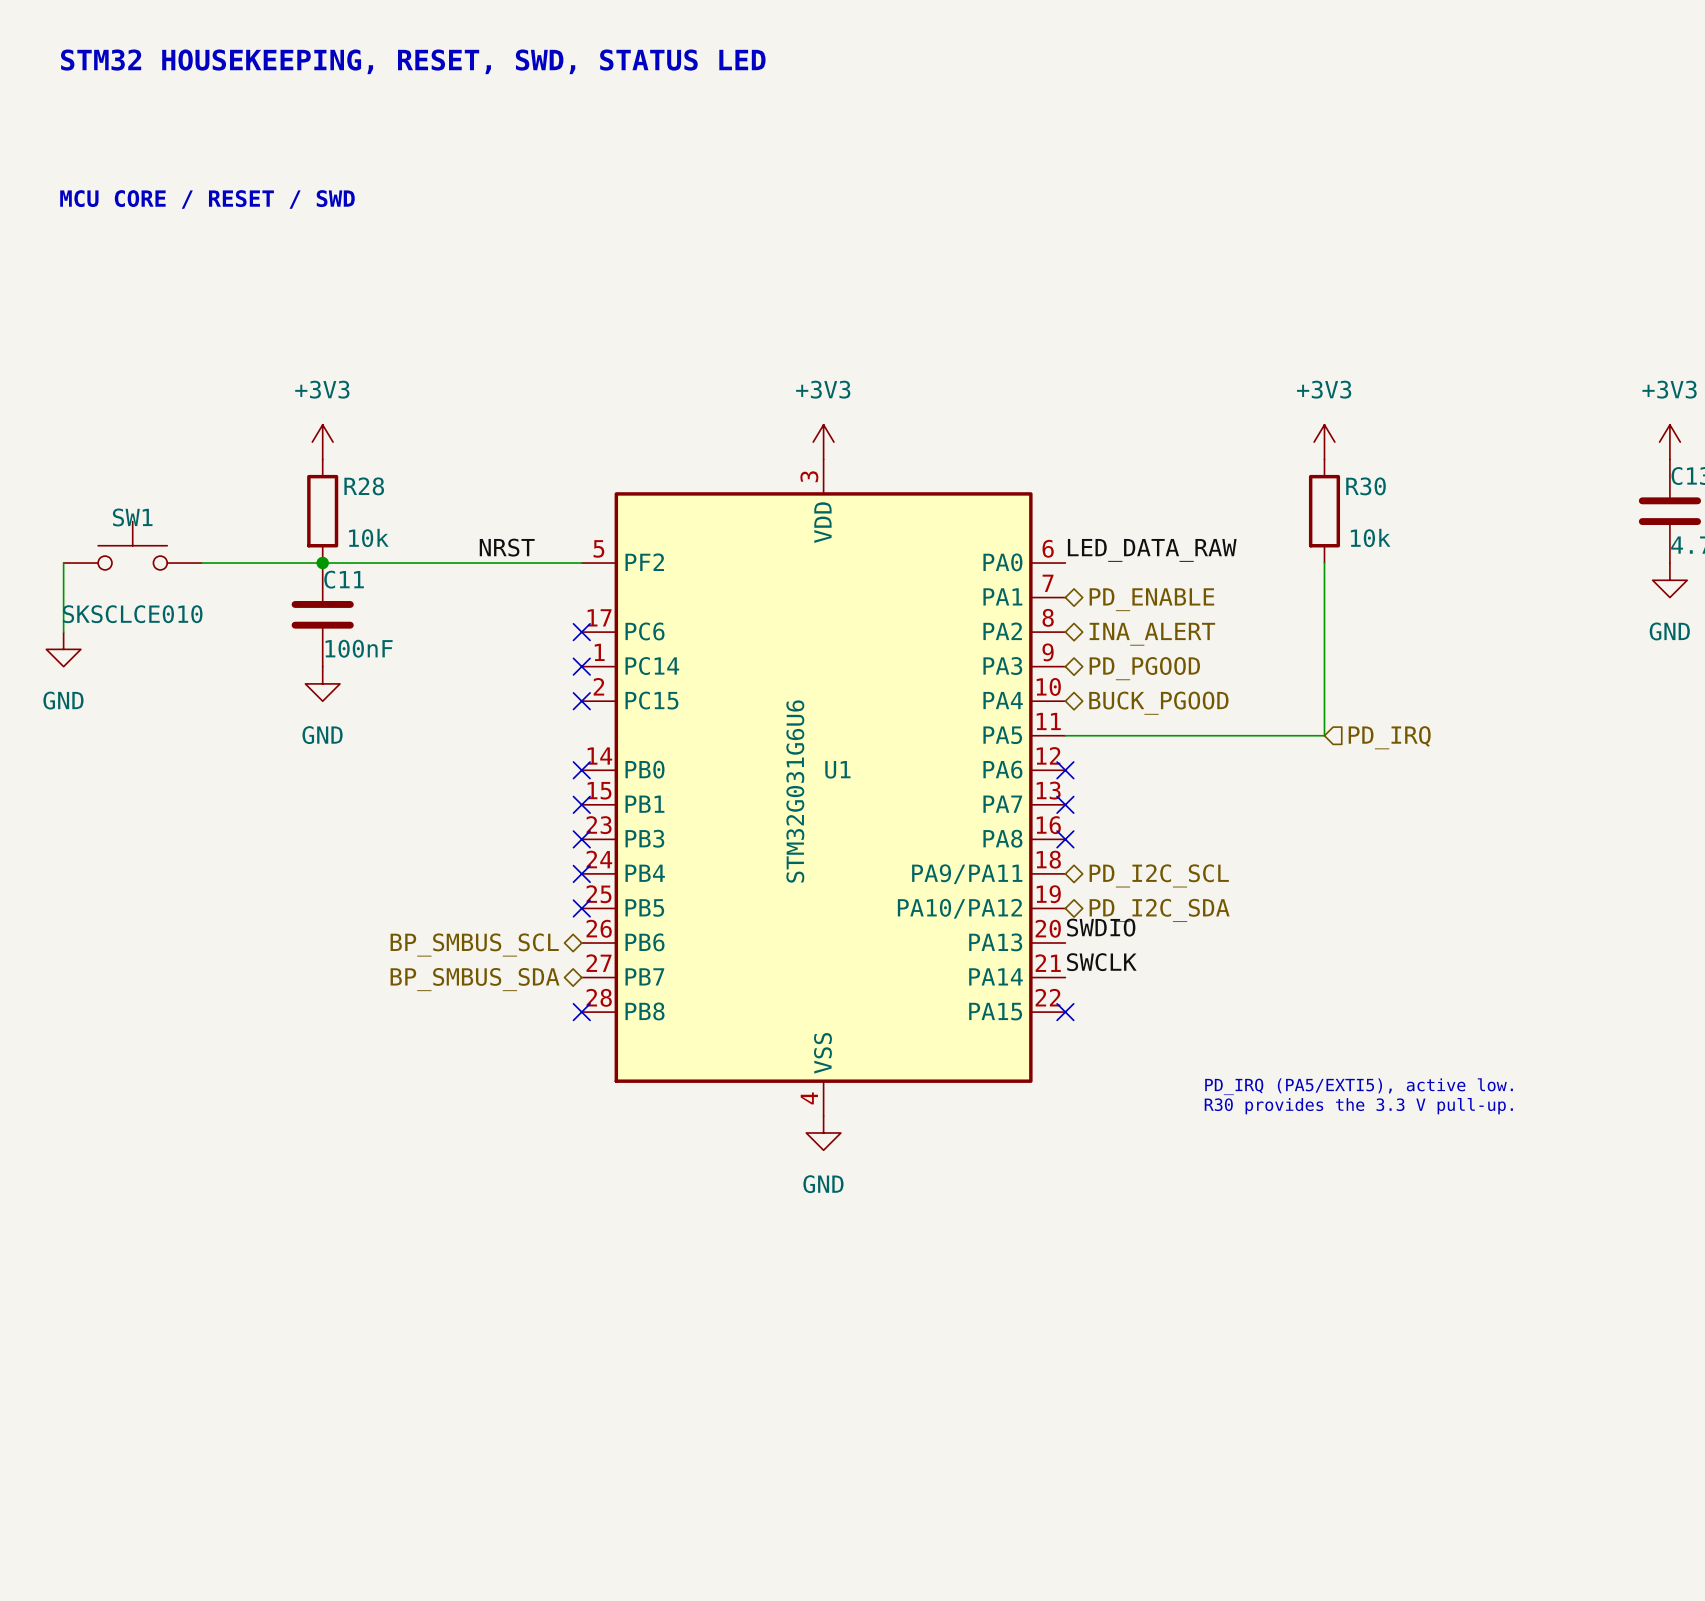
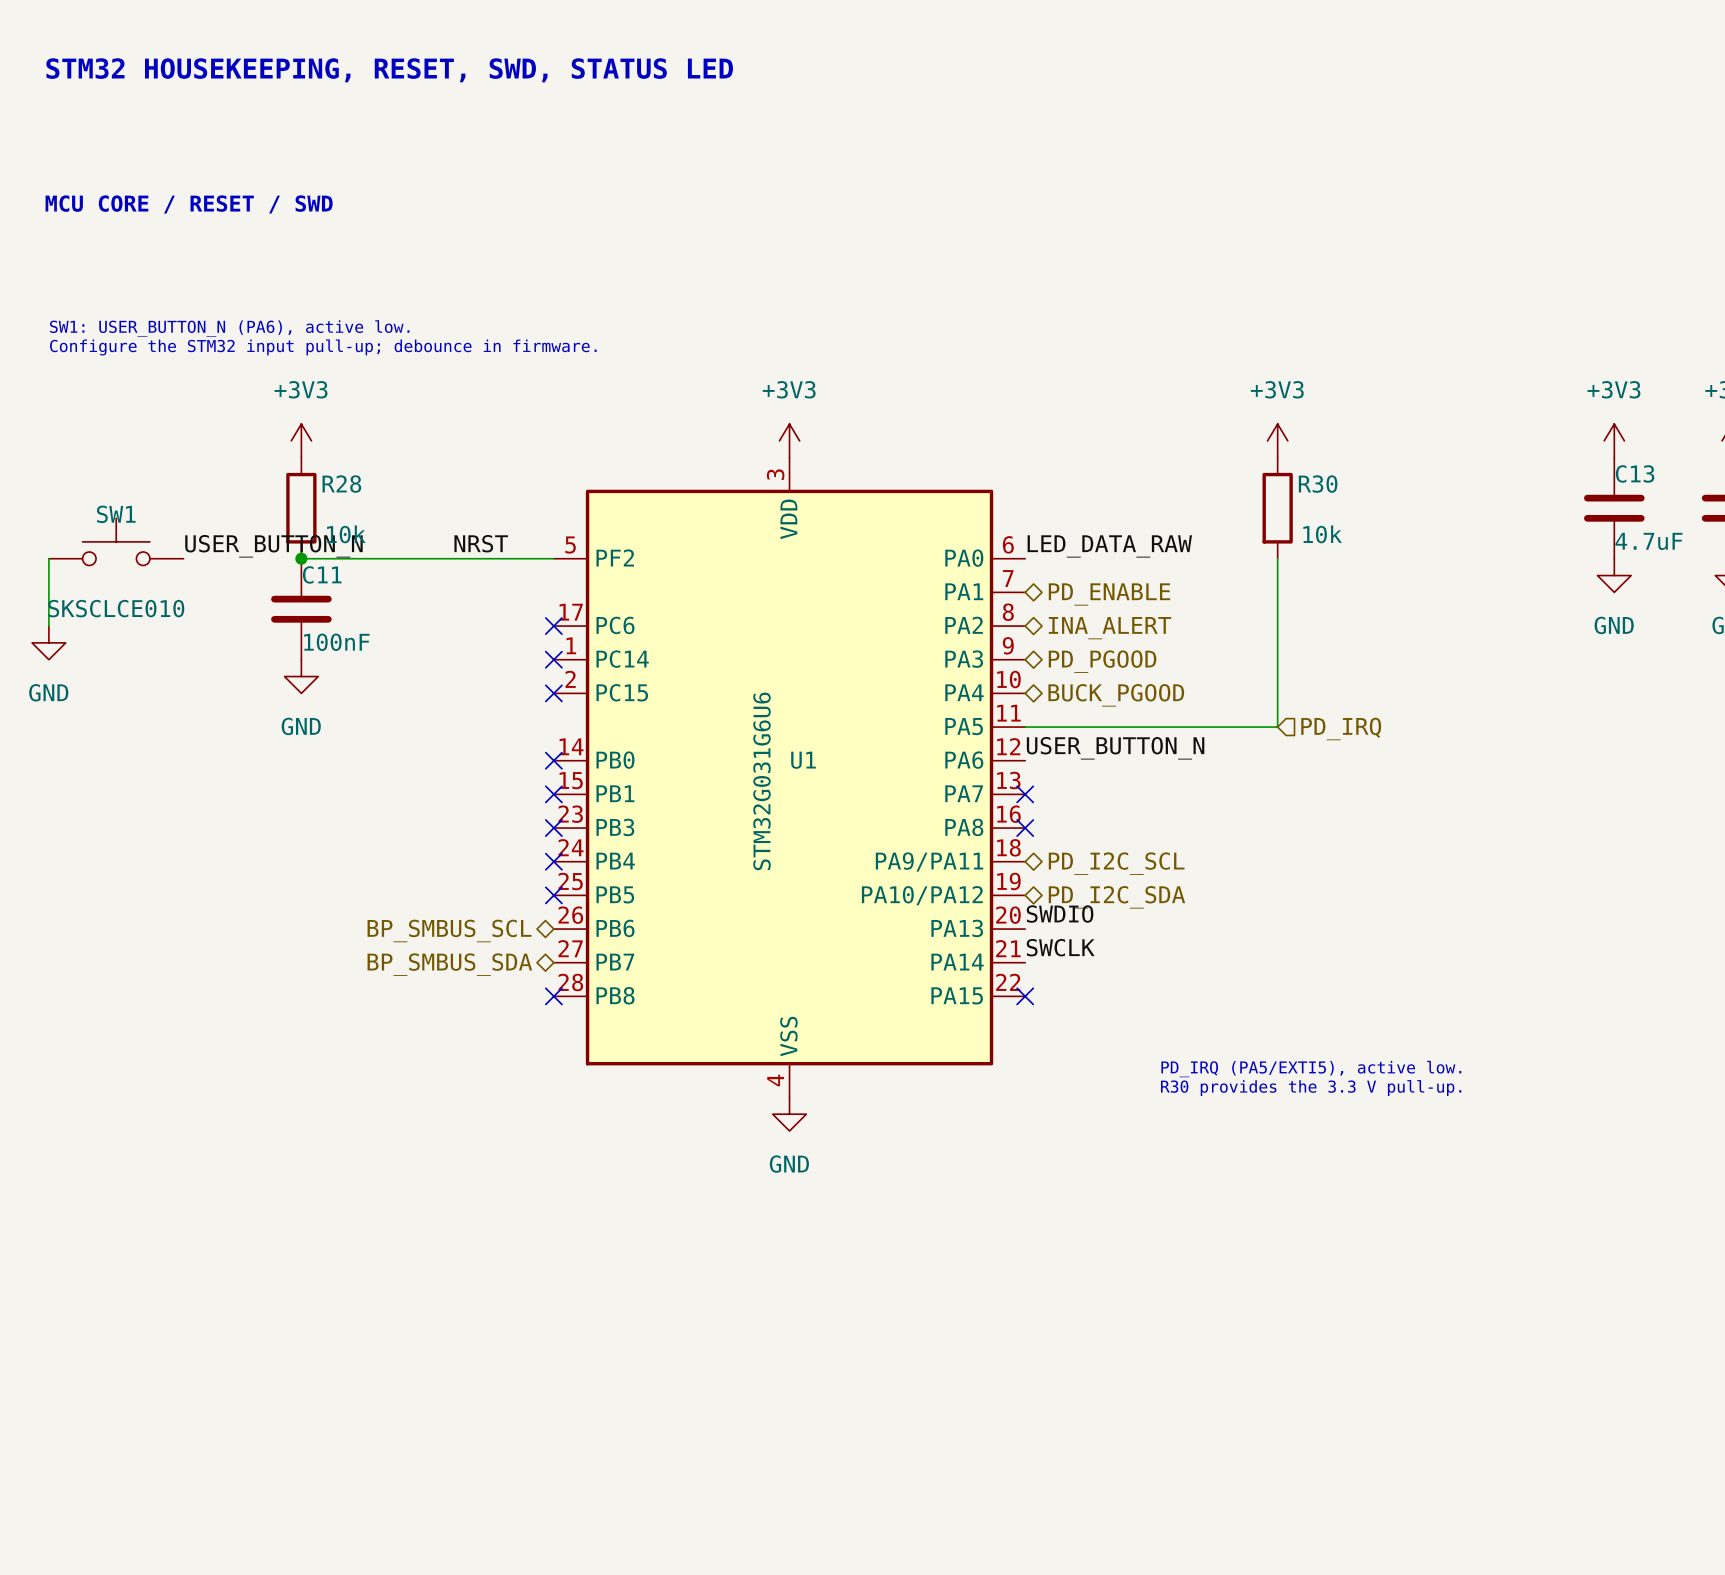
text: none -> SW1: USER_BUTTON_N (PA6), active low. (229, 328)
text: none -> Configure the STM32 input pull-up; debounce in firmware. (323, 347)
label: none -> USER_BUTTON_N (273, 546)
wire: (201, 563) (322, 563) -> none
label: none -> USER_BUTTON_N (1115, 748)
no-connect mark: (1065, 770) -> none

